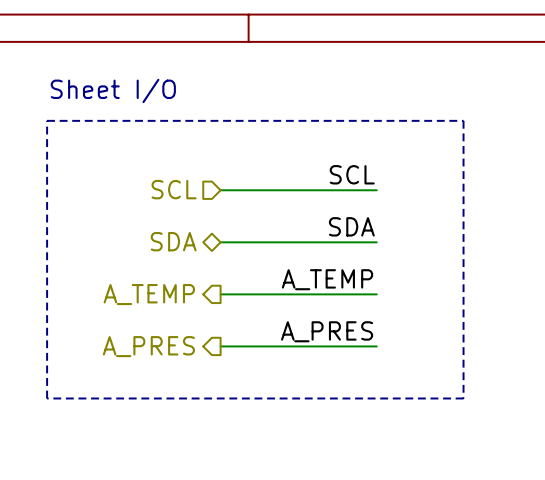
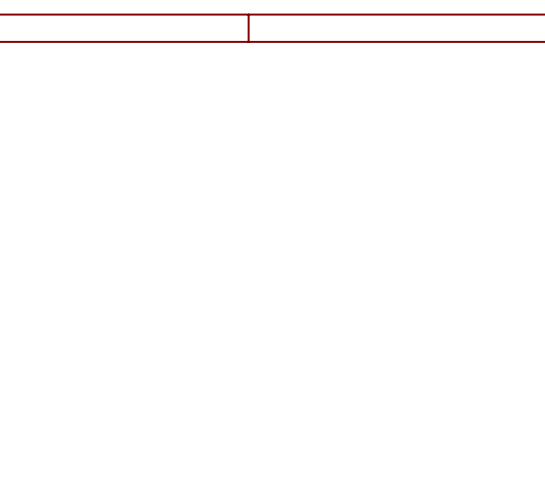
text: Sheet I/O (113, 90) -> none
line: (47, 120) (463, 120) (463, 398) (47, 398) (47, 120) -> none
label: SCL (352, 174) -> none
hierarchical label: SCL (174, 189) -> none
wire: (220, 190) (376, 190) -> none
label: SDA (351, 226) -> none
hierarchical label: SDA (173, 241) -> none
wire: (220, 242) (376, 242) -> none
label: A_TEMP (327, 279) -> none
hierarchical label: A_TEMP (149, 294) -> none
wire: (220, 294) (376, 294) -> none
label: A_PRES (327, 331) -> none
hierarchical label: A_PRES (148, 346) -> none
wire: (220, 346) (376, 346) -> none

